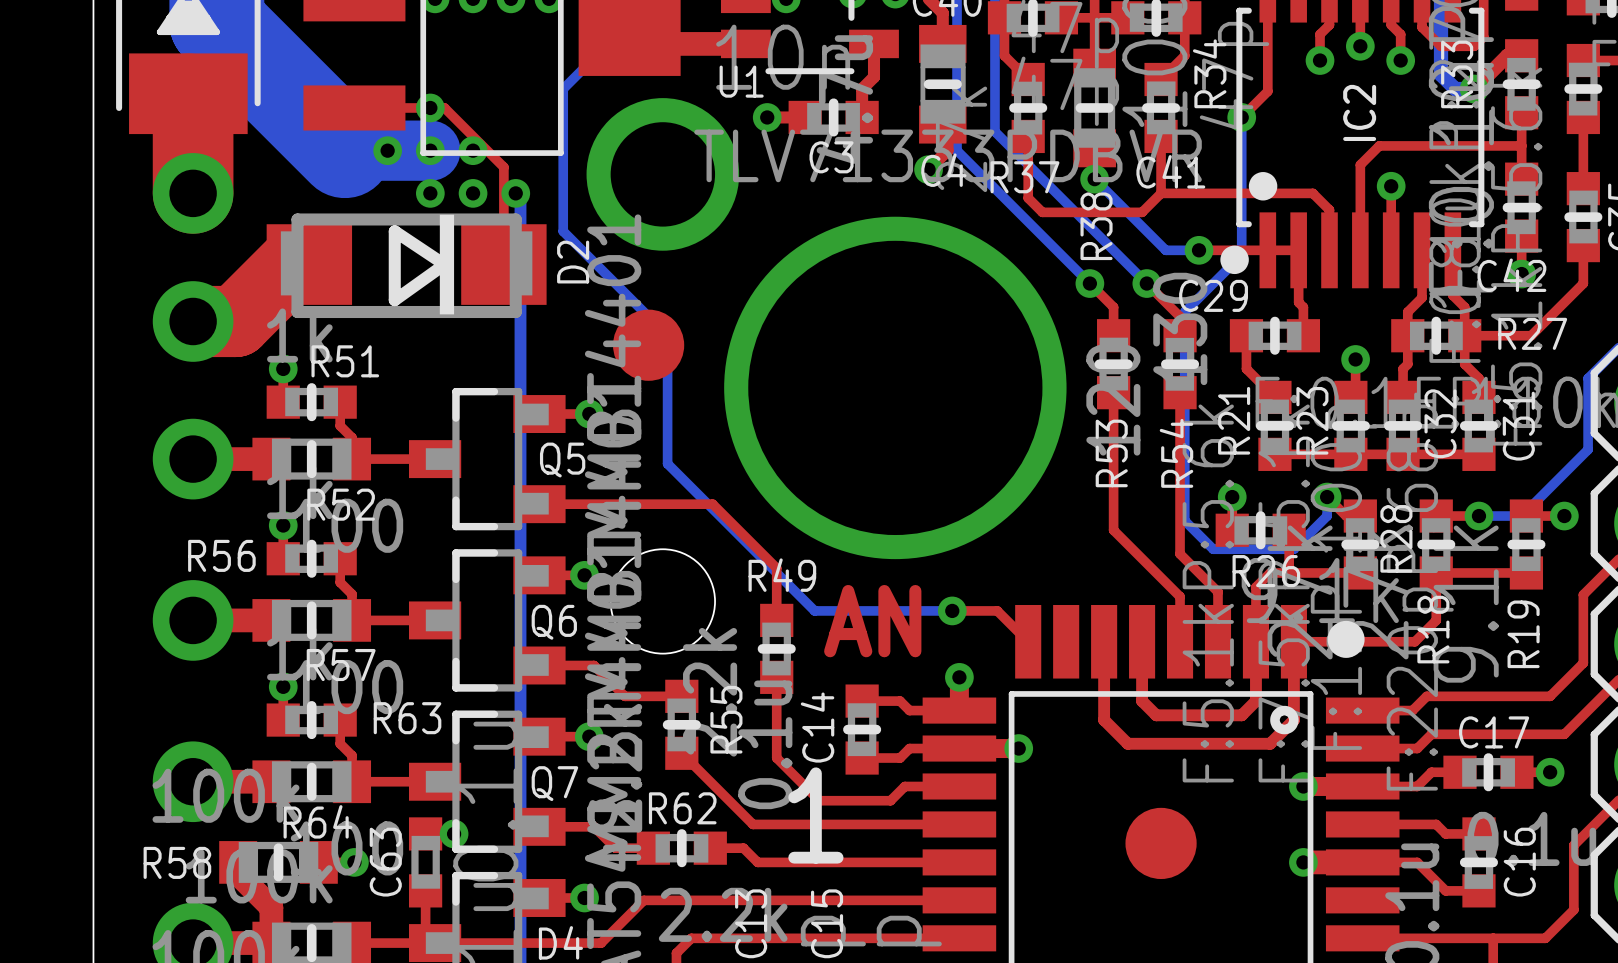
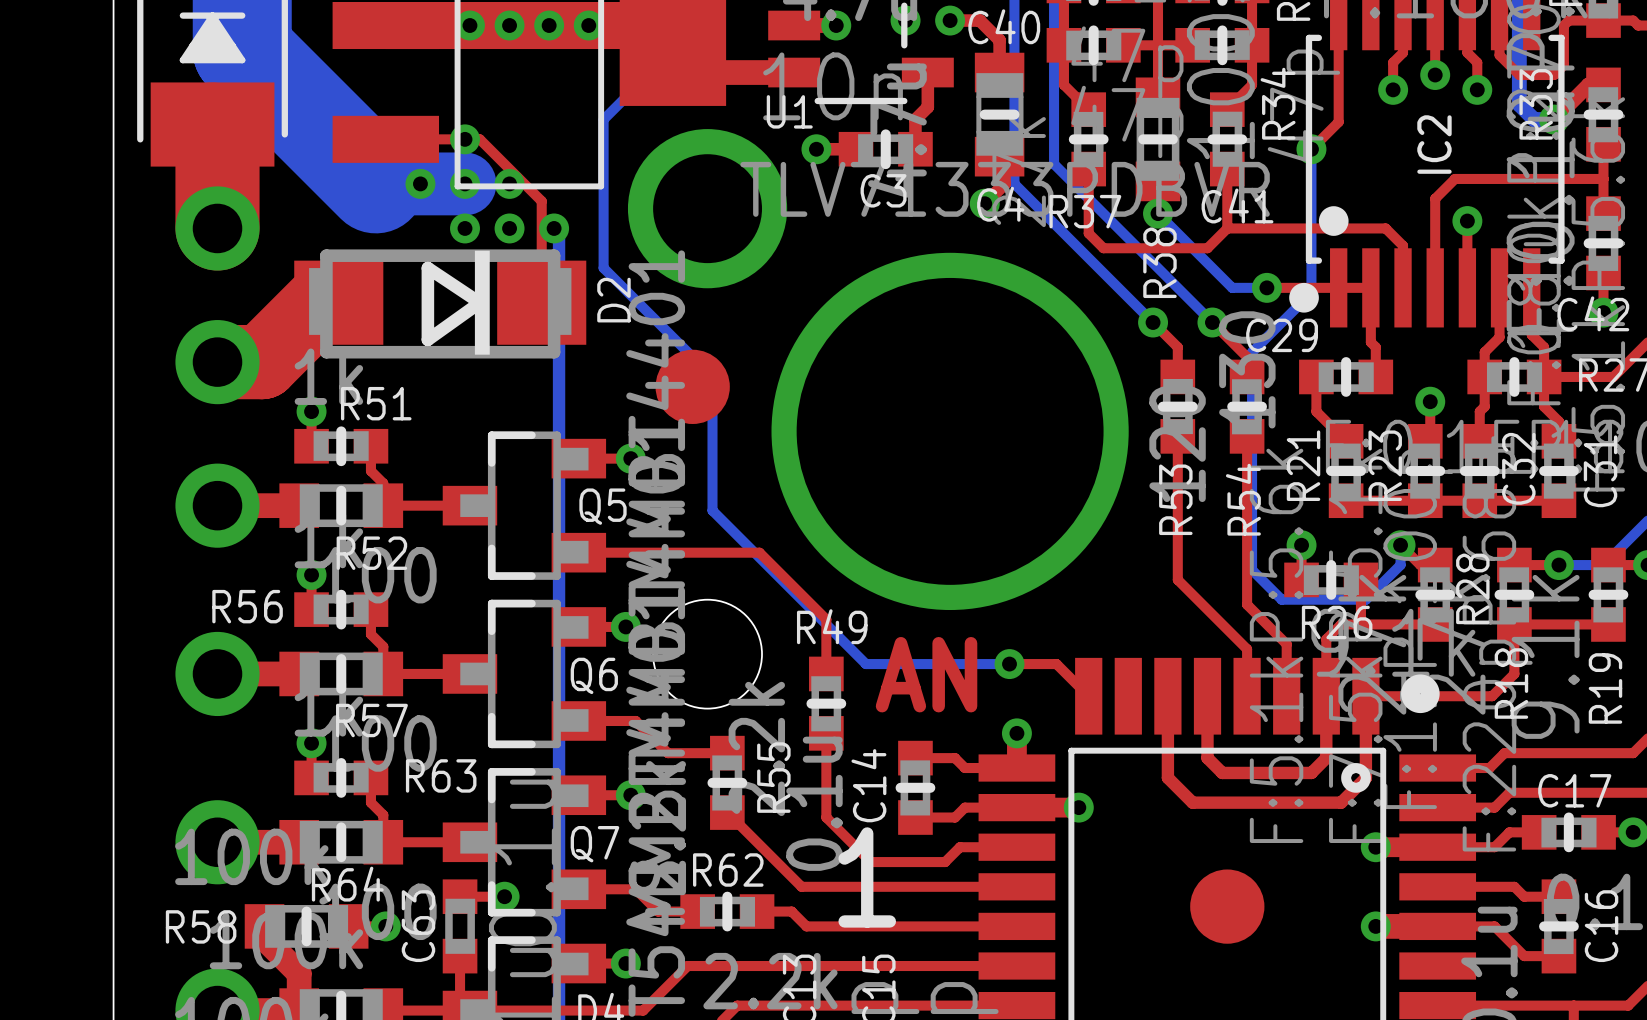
via position: (454, 833) -> (504, 896)

